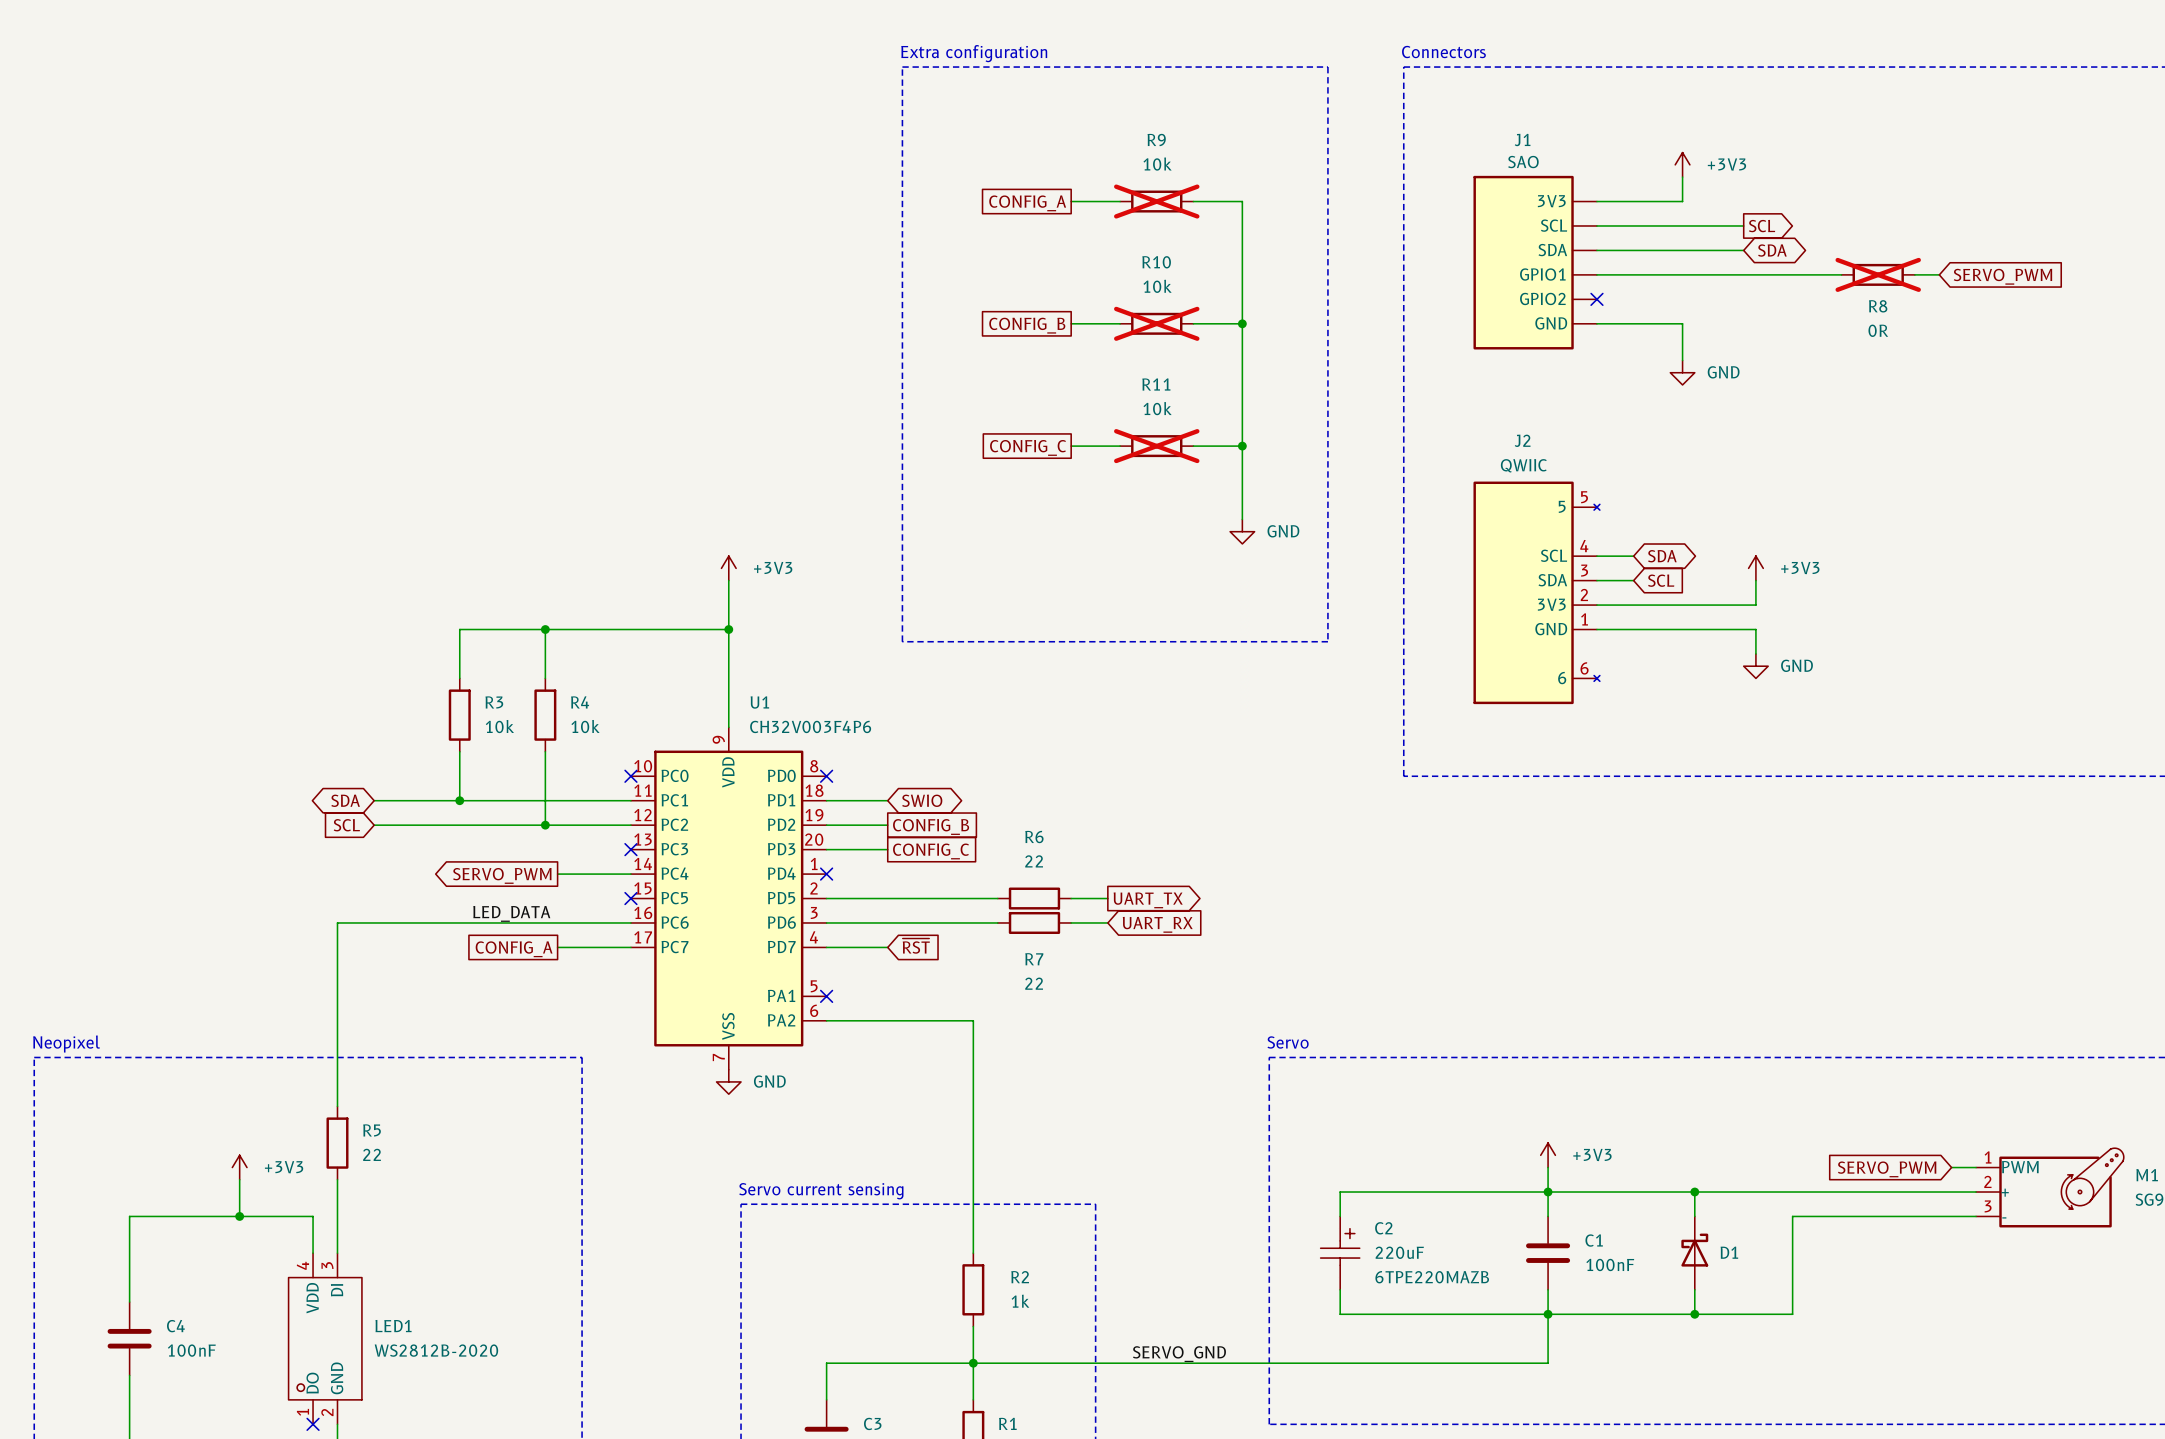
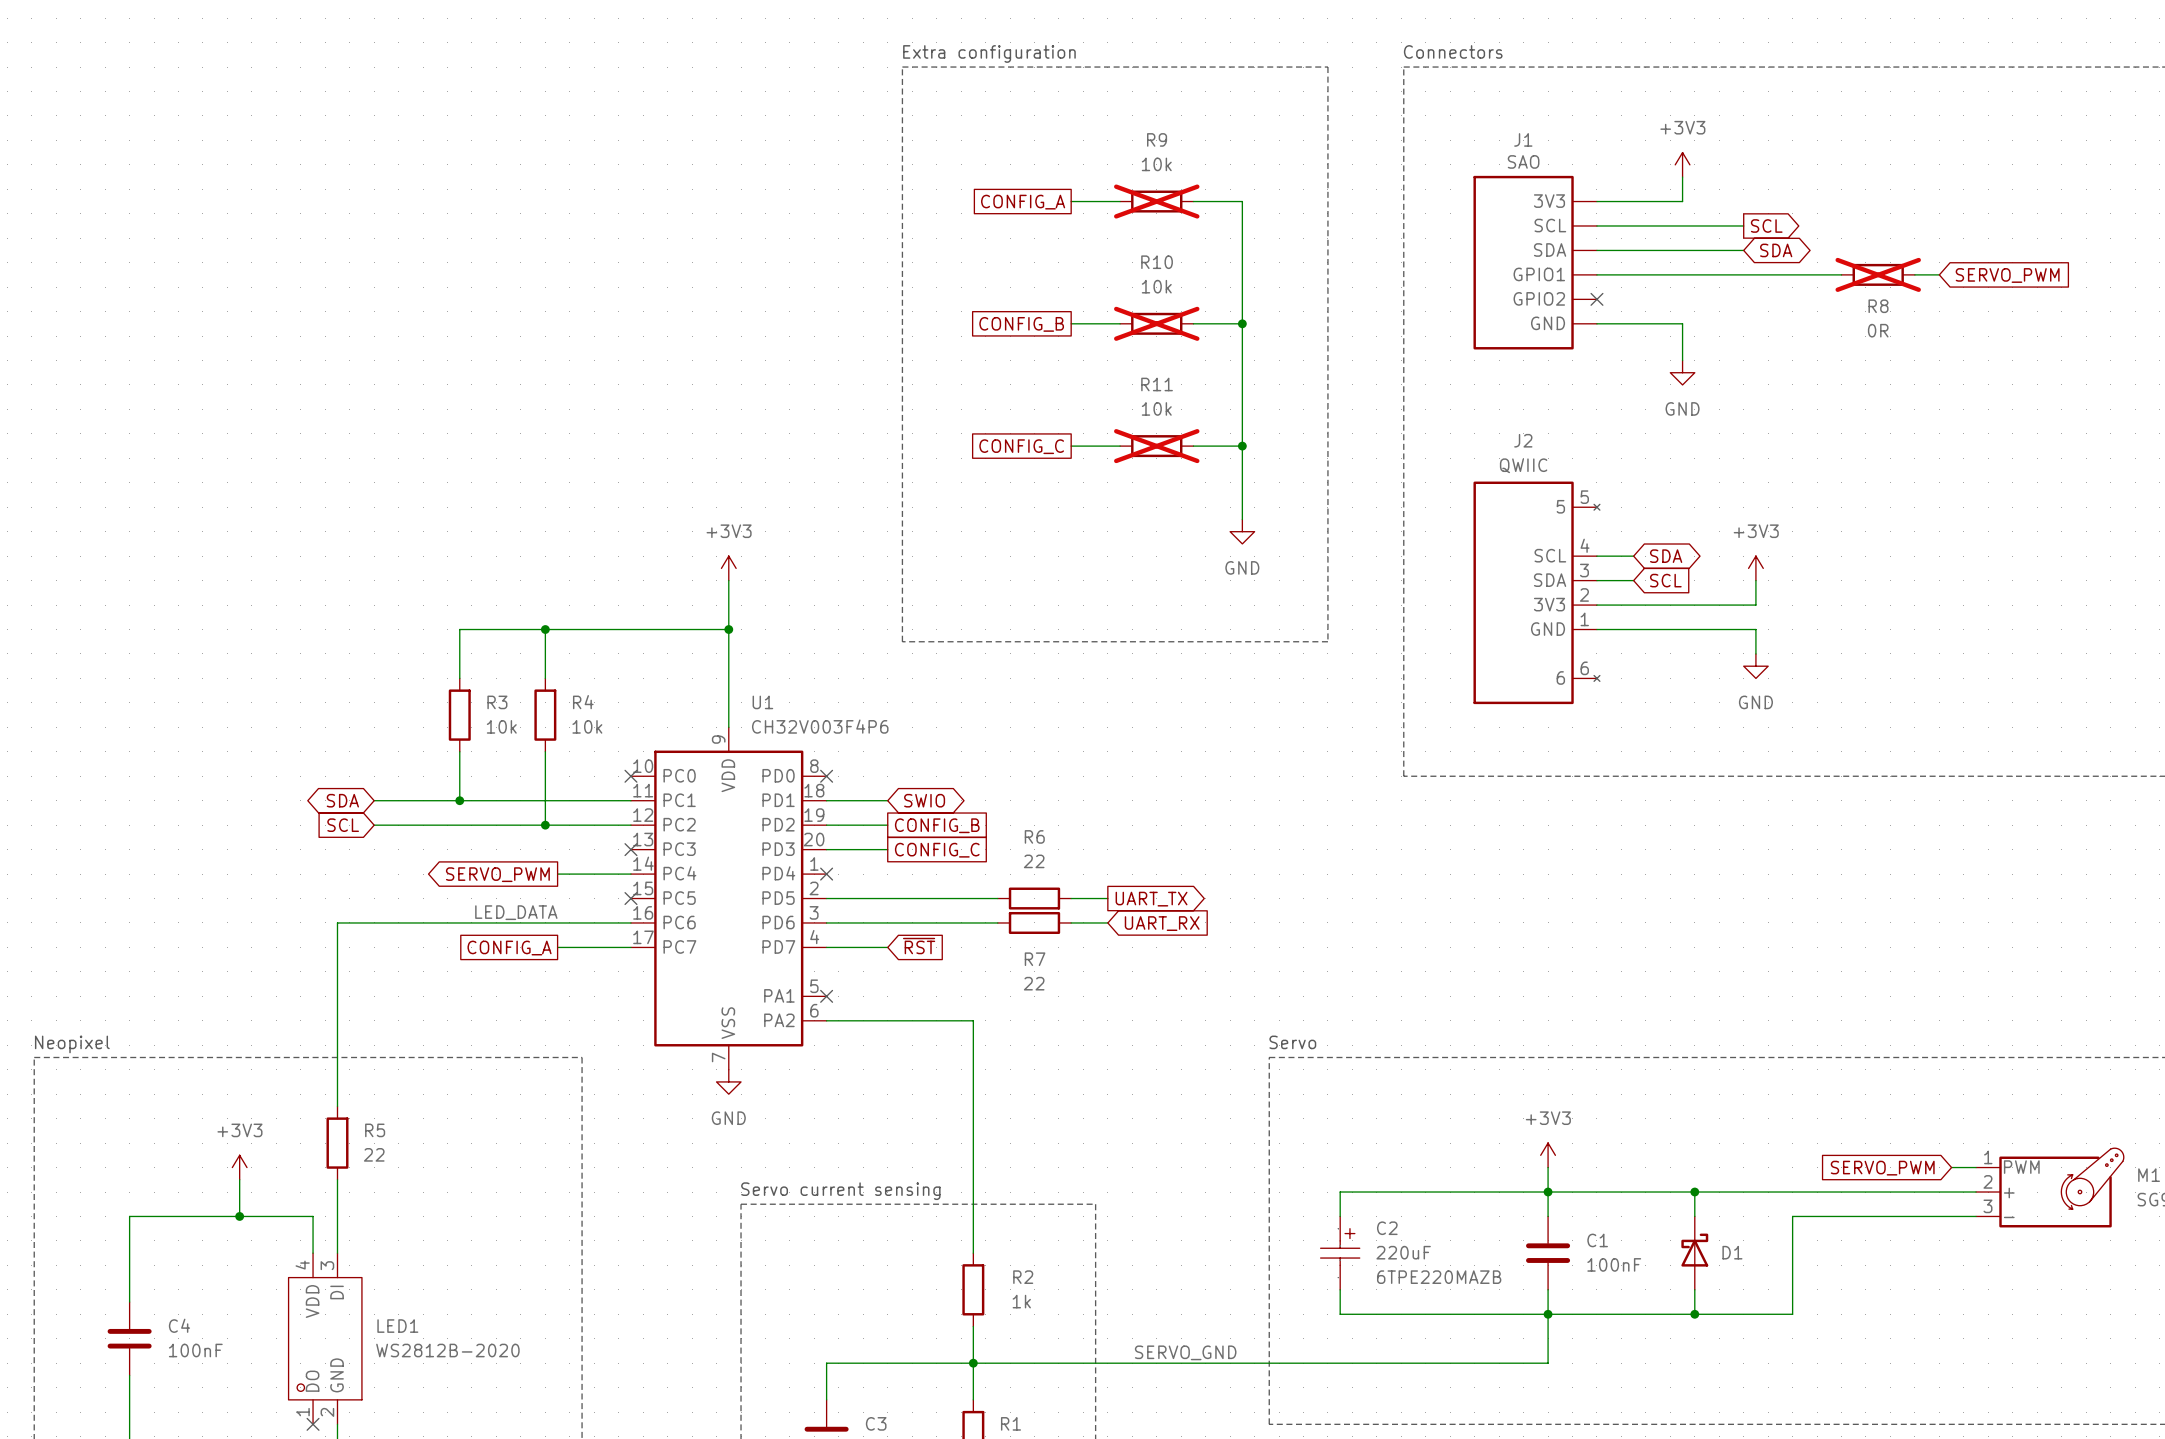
power symbol text position: +3V3 (1726, 164) -> +3V3 (1682, 127)
power symbol text position: GND (1723, 372) -> GND (1682, 408)
power symbol text position: GND (1283, 531) -> GND (1242, 567)
power symbol text position: +3V3 (773, 568) -> +3V3 (729, 531)
power symbol text position: +3V3 (1800, 568) -> +3V3 (1756, 531)
power symbol text position: GND (1796, 665) -> GND (1755, 702)
power symbol text position: GND (769, 1081) -> GND (728, 1118)
power symbol text position: +3V3 (1592, 1154) -> +3V3 (1548, 1118)
power symbol text position: +3V3 (284, 1167) -> +3V3 (239, 1130)

